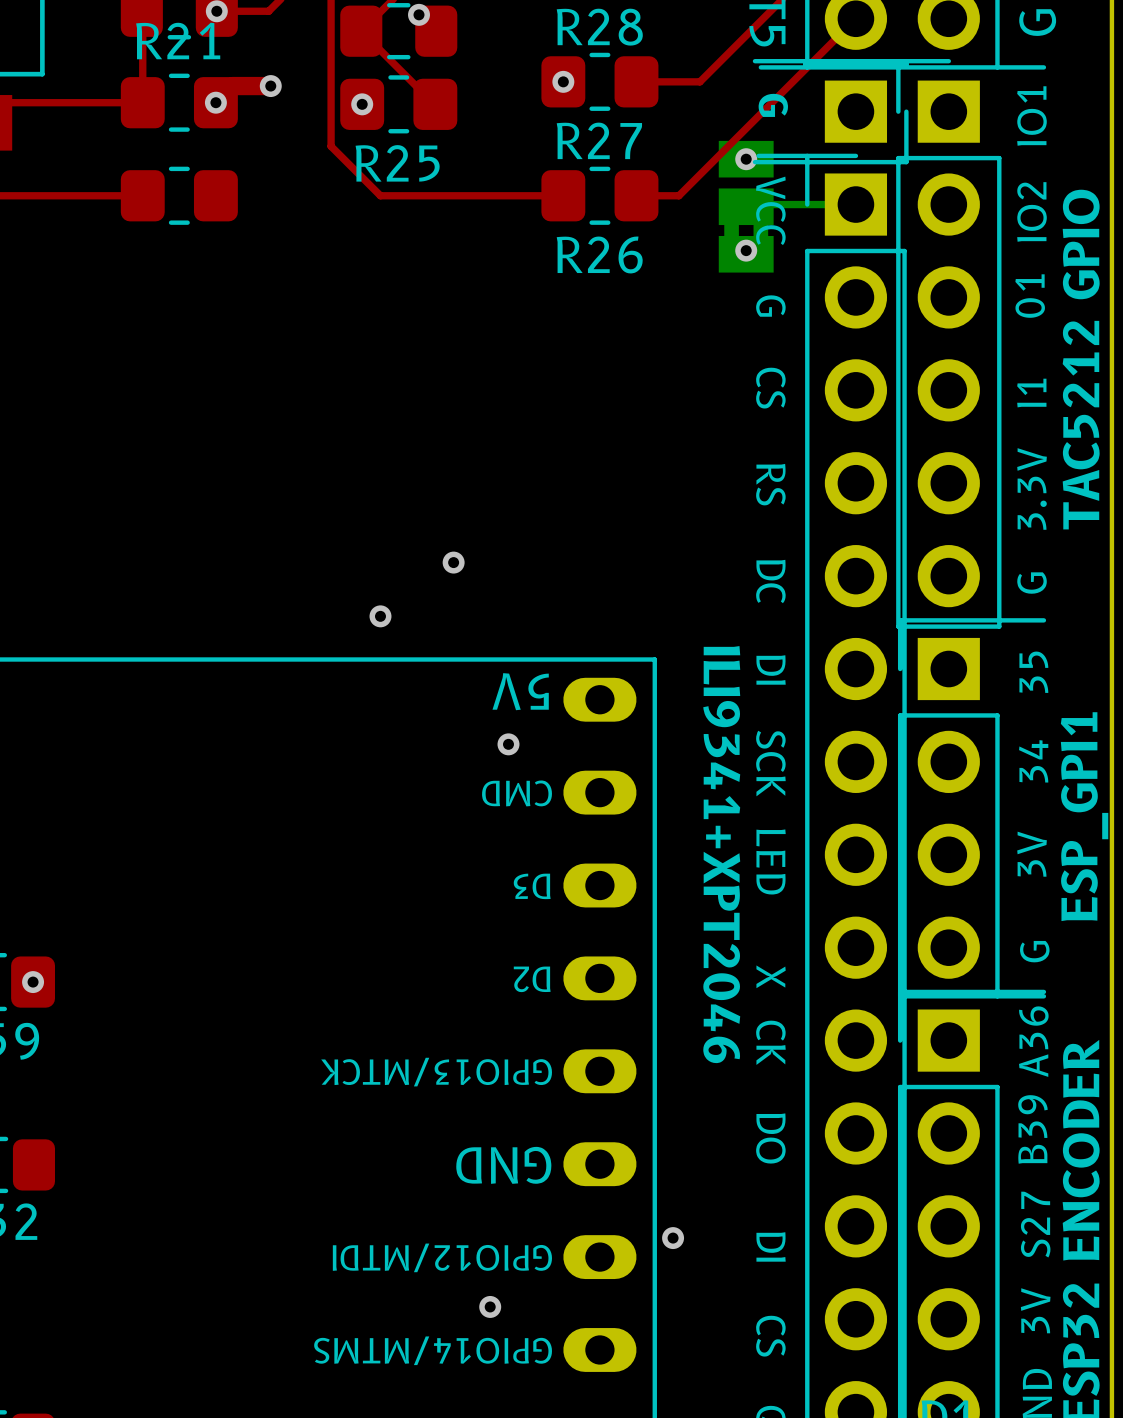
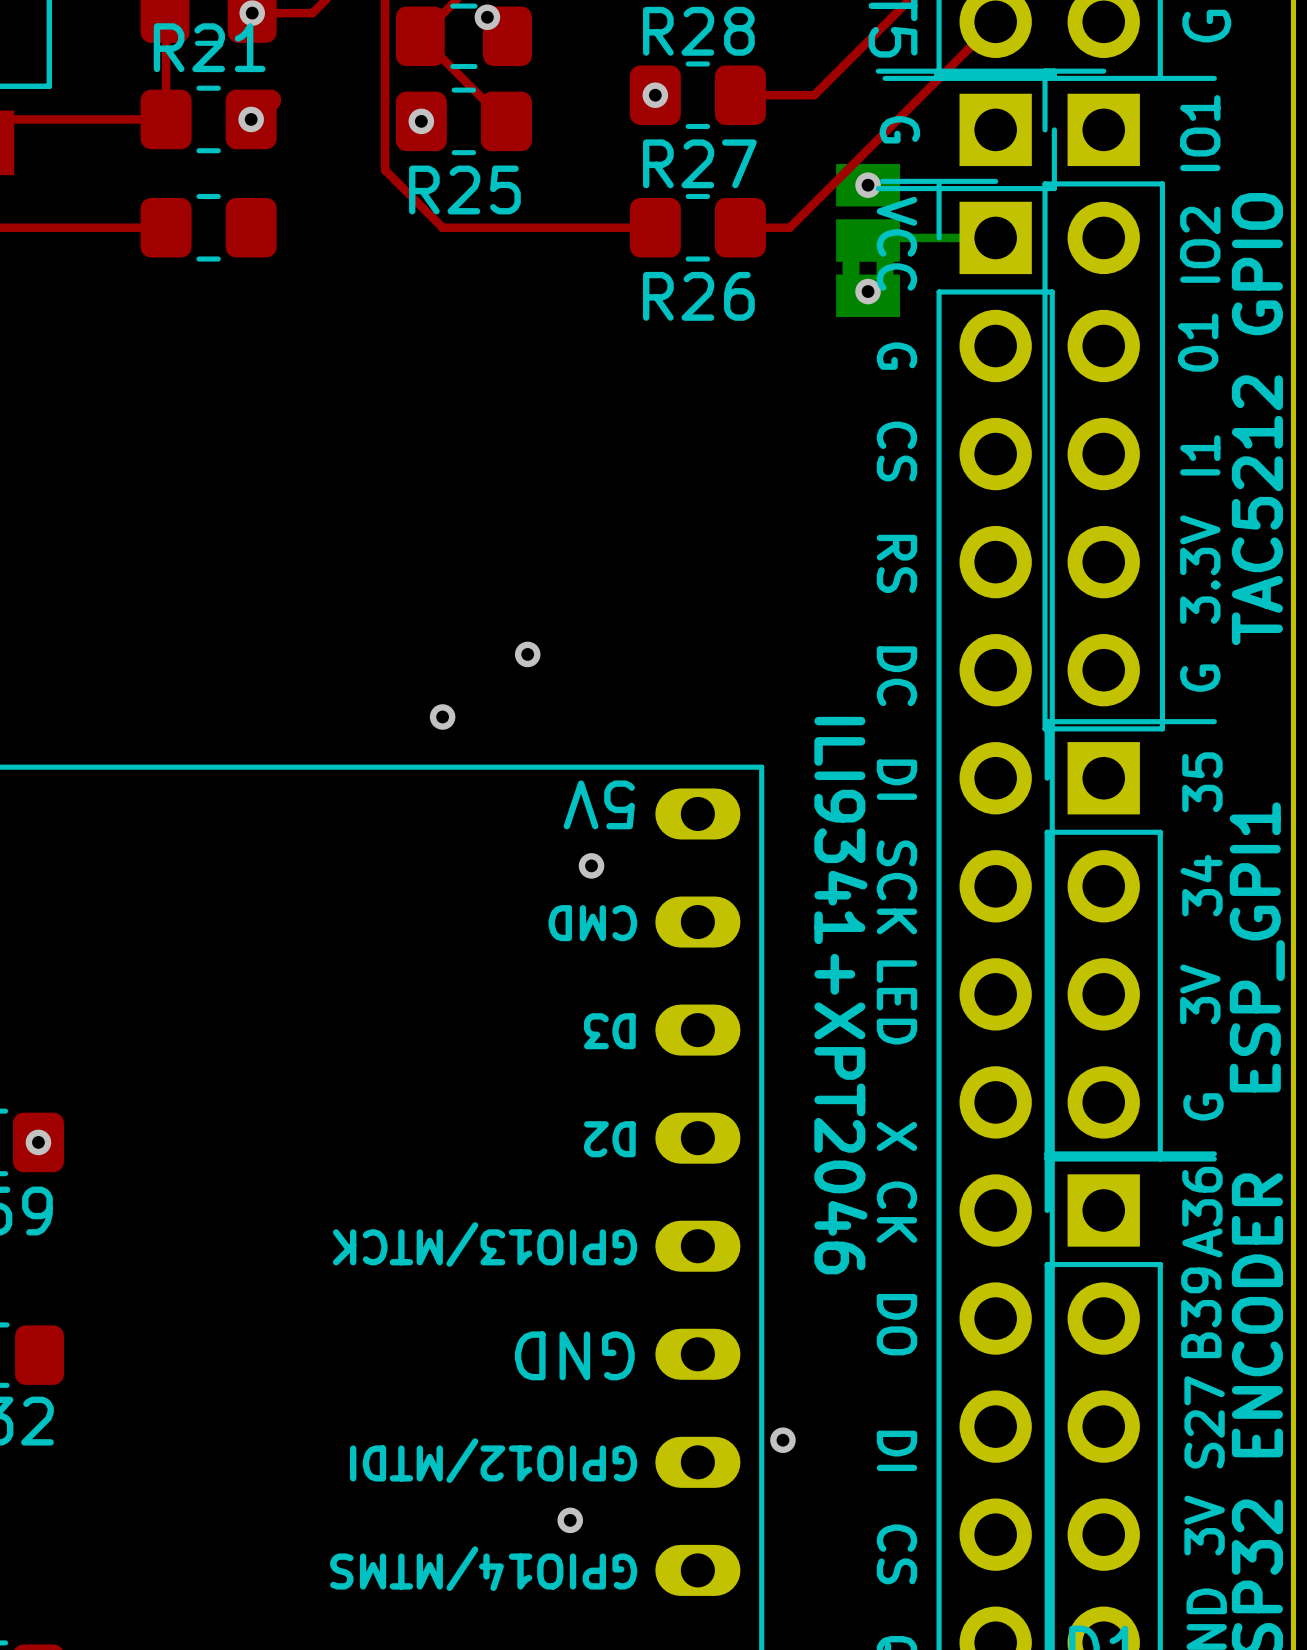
top track: (232, 86) (270, 86) -> none
via: (270, 86) -> none

